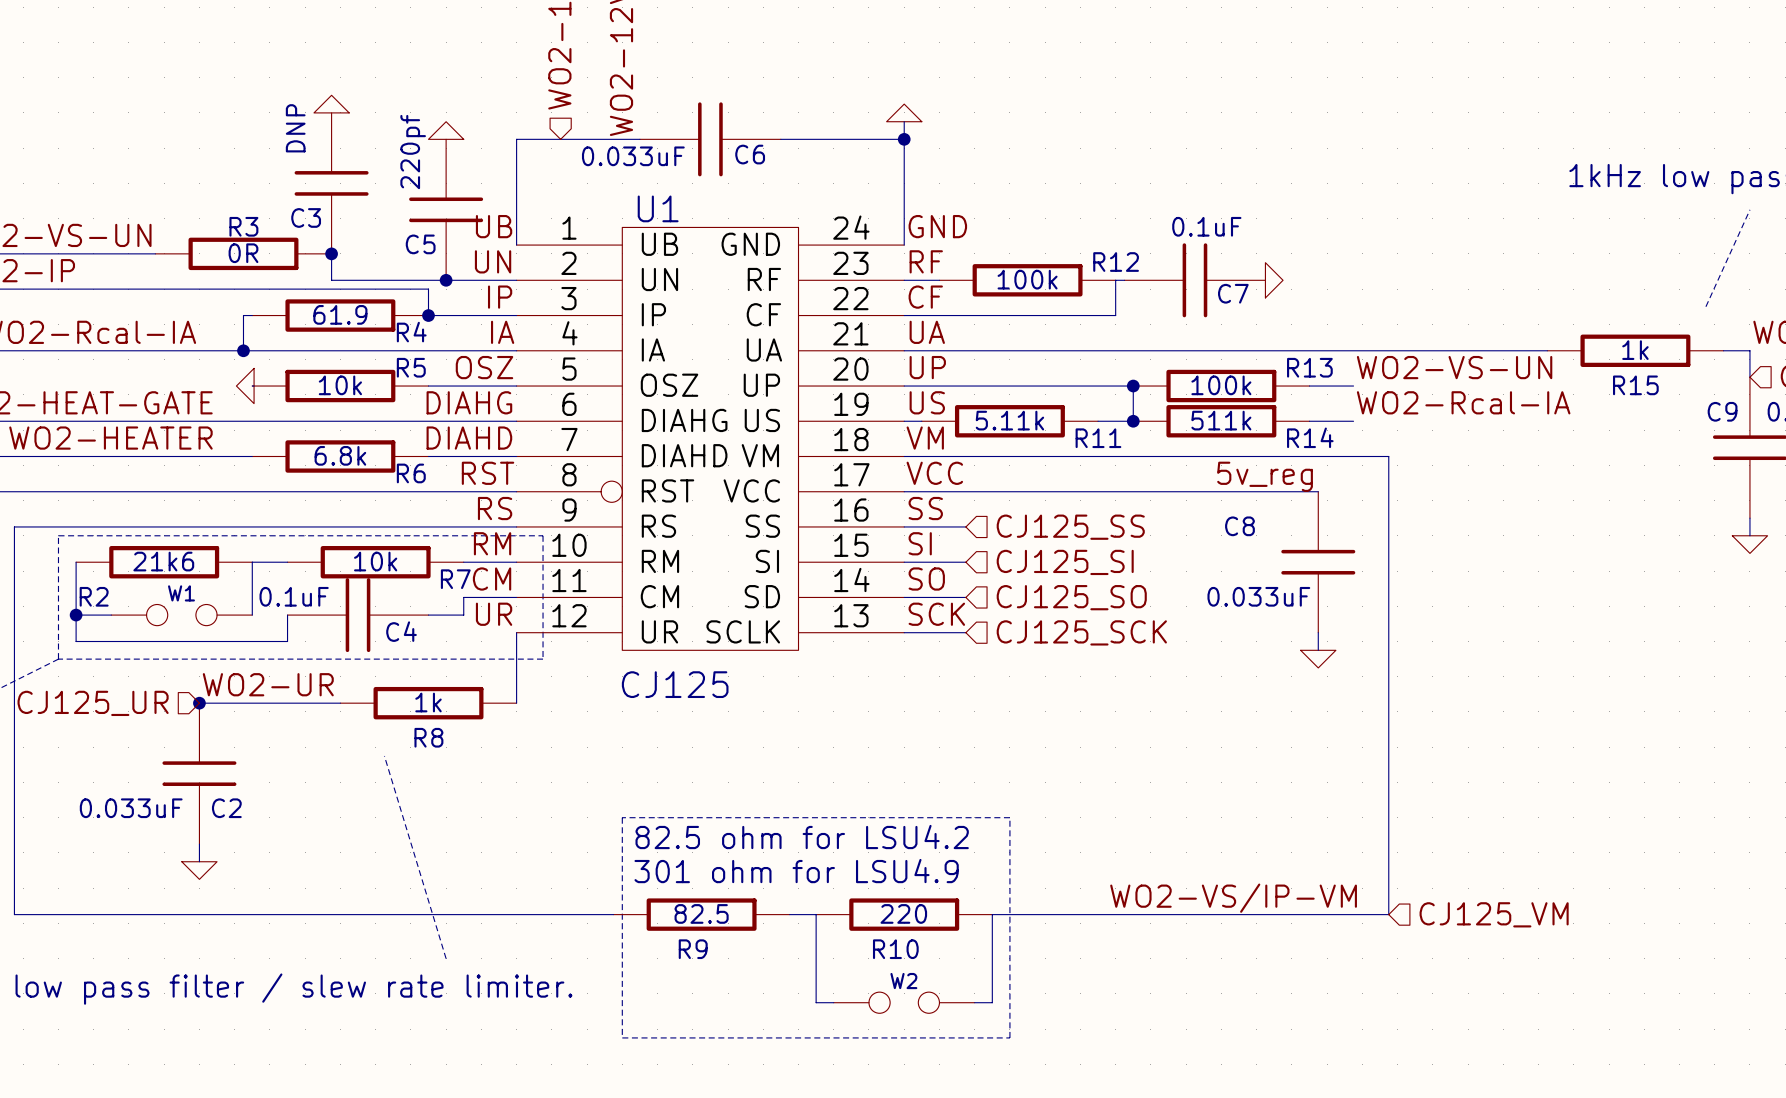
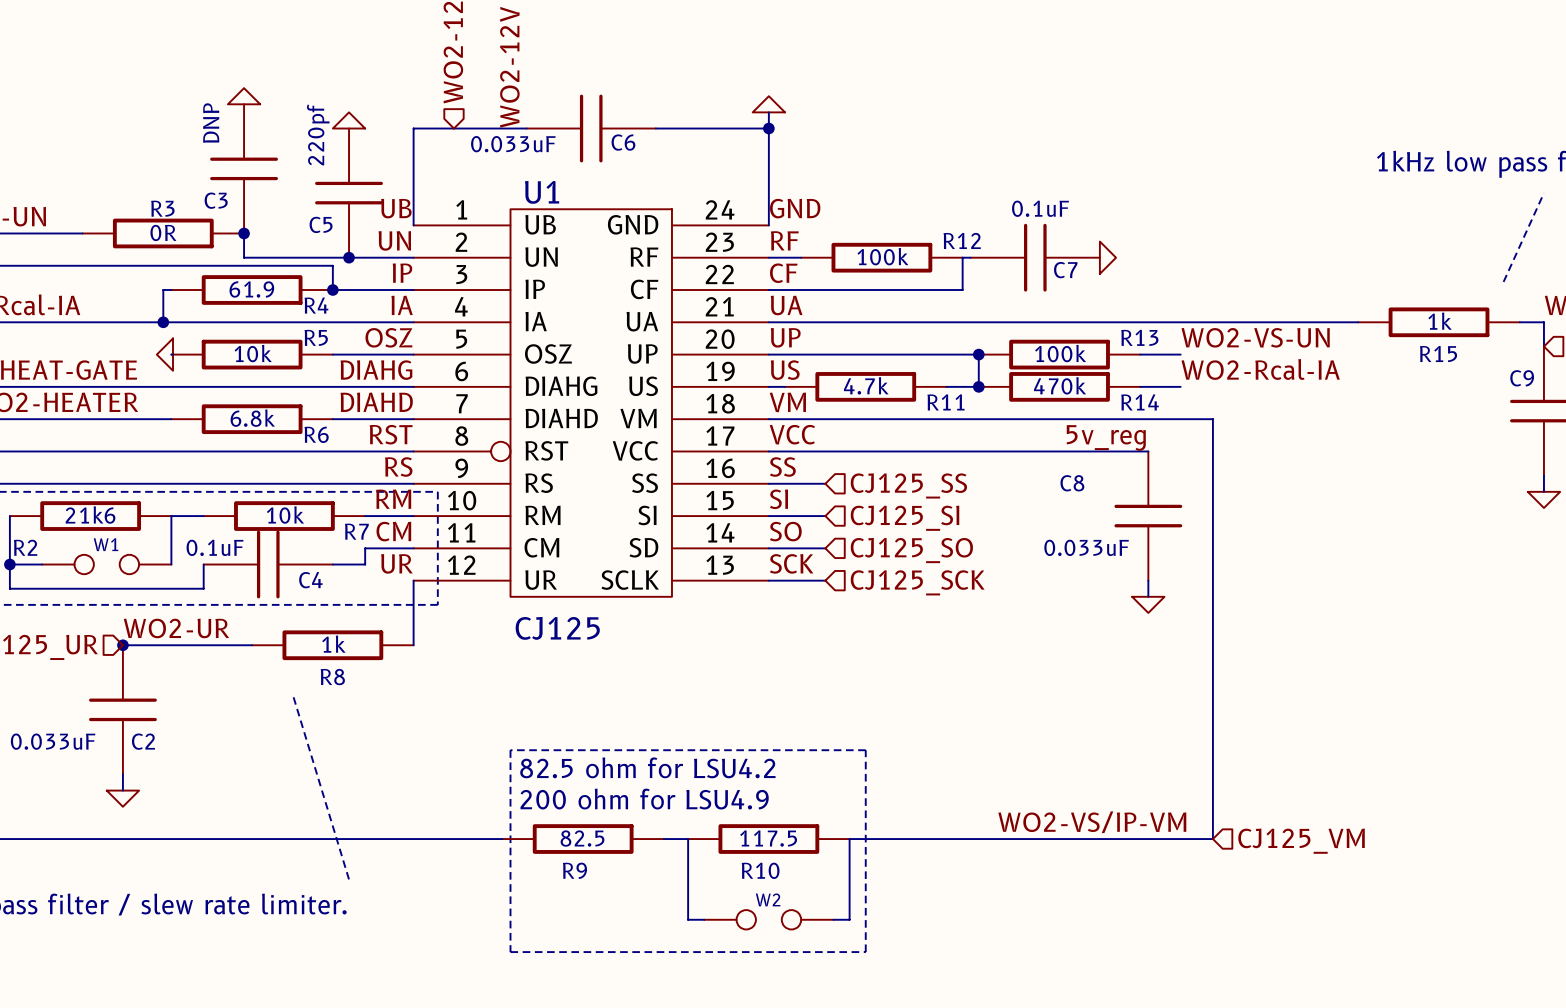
R11 value: 5.11k (1009, 420) -> 4.7k (866, 385)
R14 value: 511k (1221, 420) -> 470k (1060, 385)
text: 301 ohm for LSU4.9 (796, 871) -> 200 ohm for LSU4.9 (644, 799)
R10 value: 220 (903, 913) -> 117.5 (768, 838)

